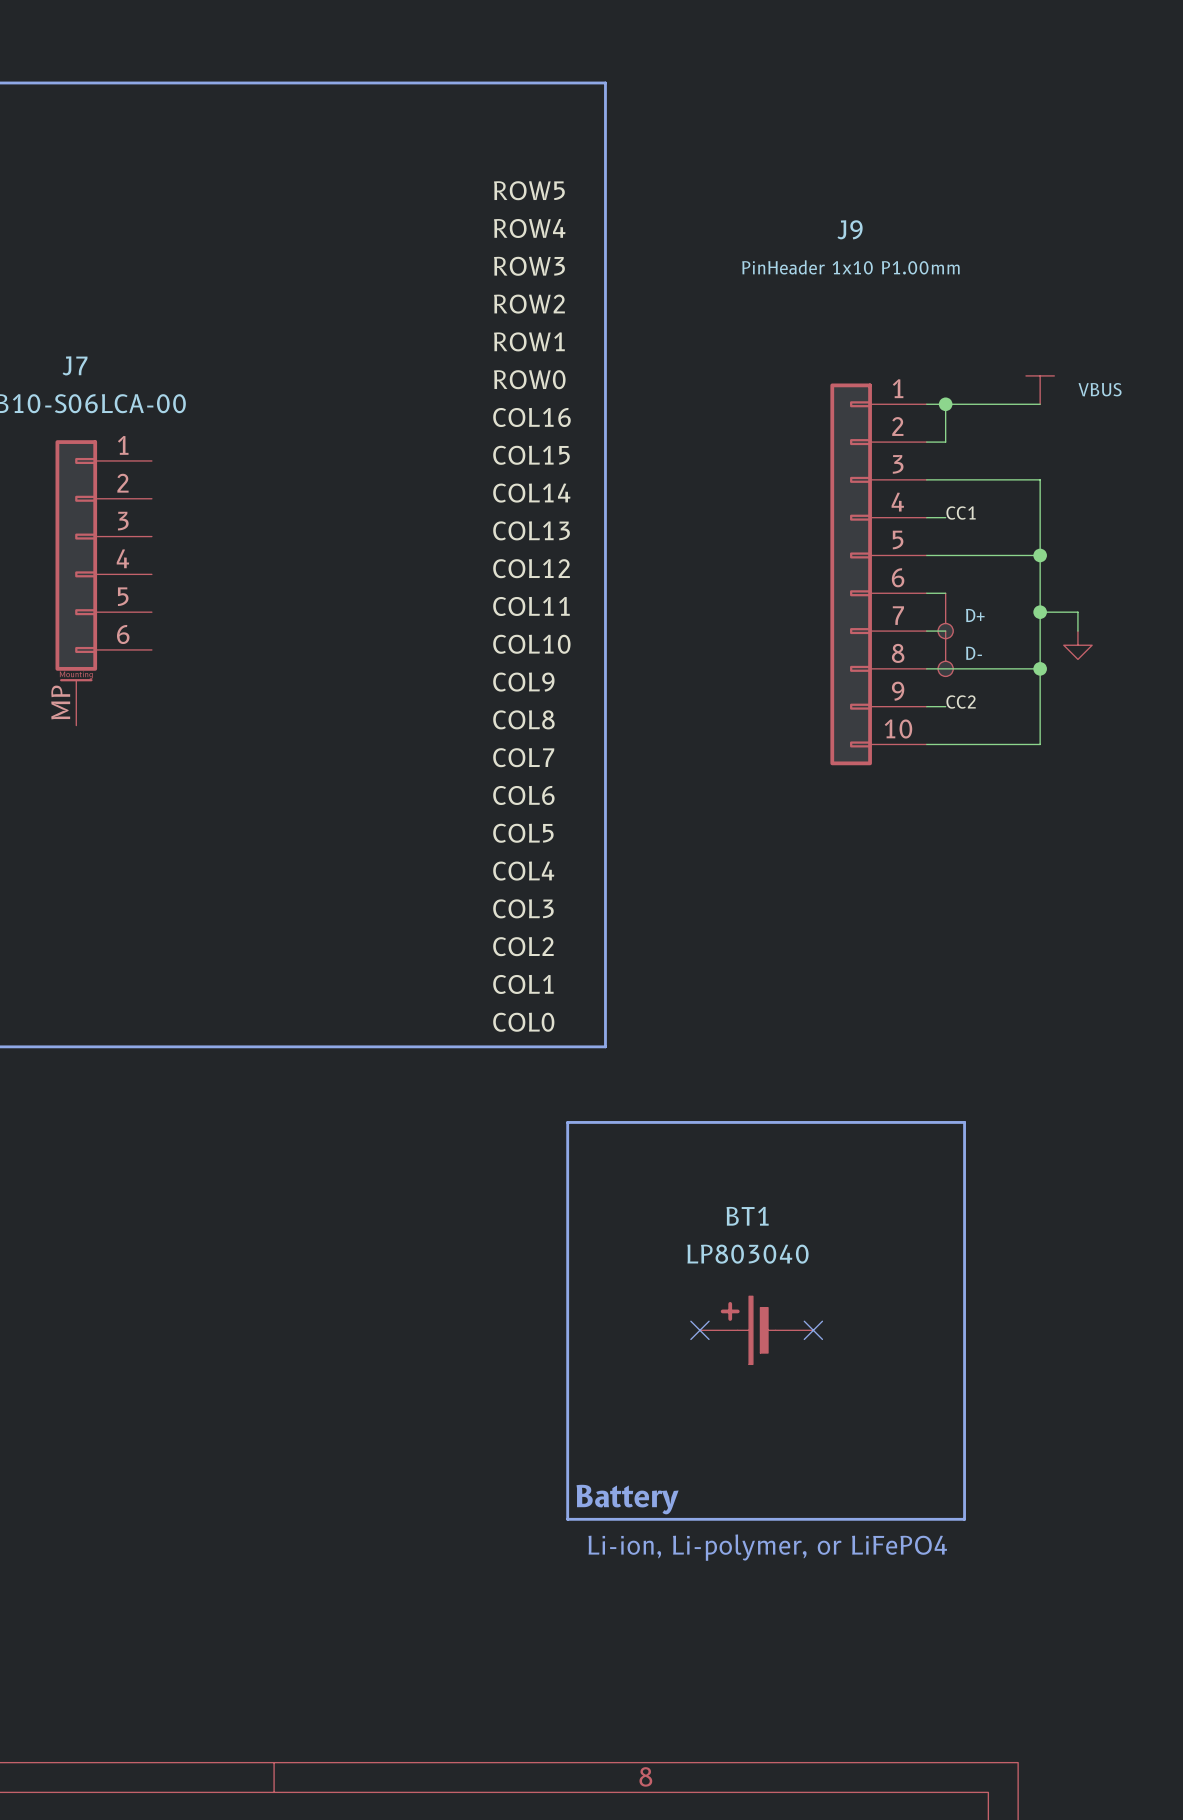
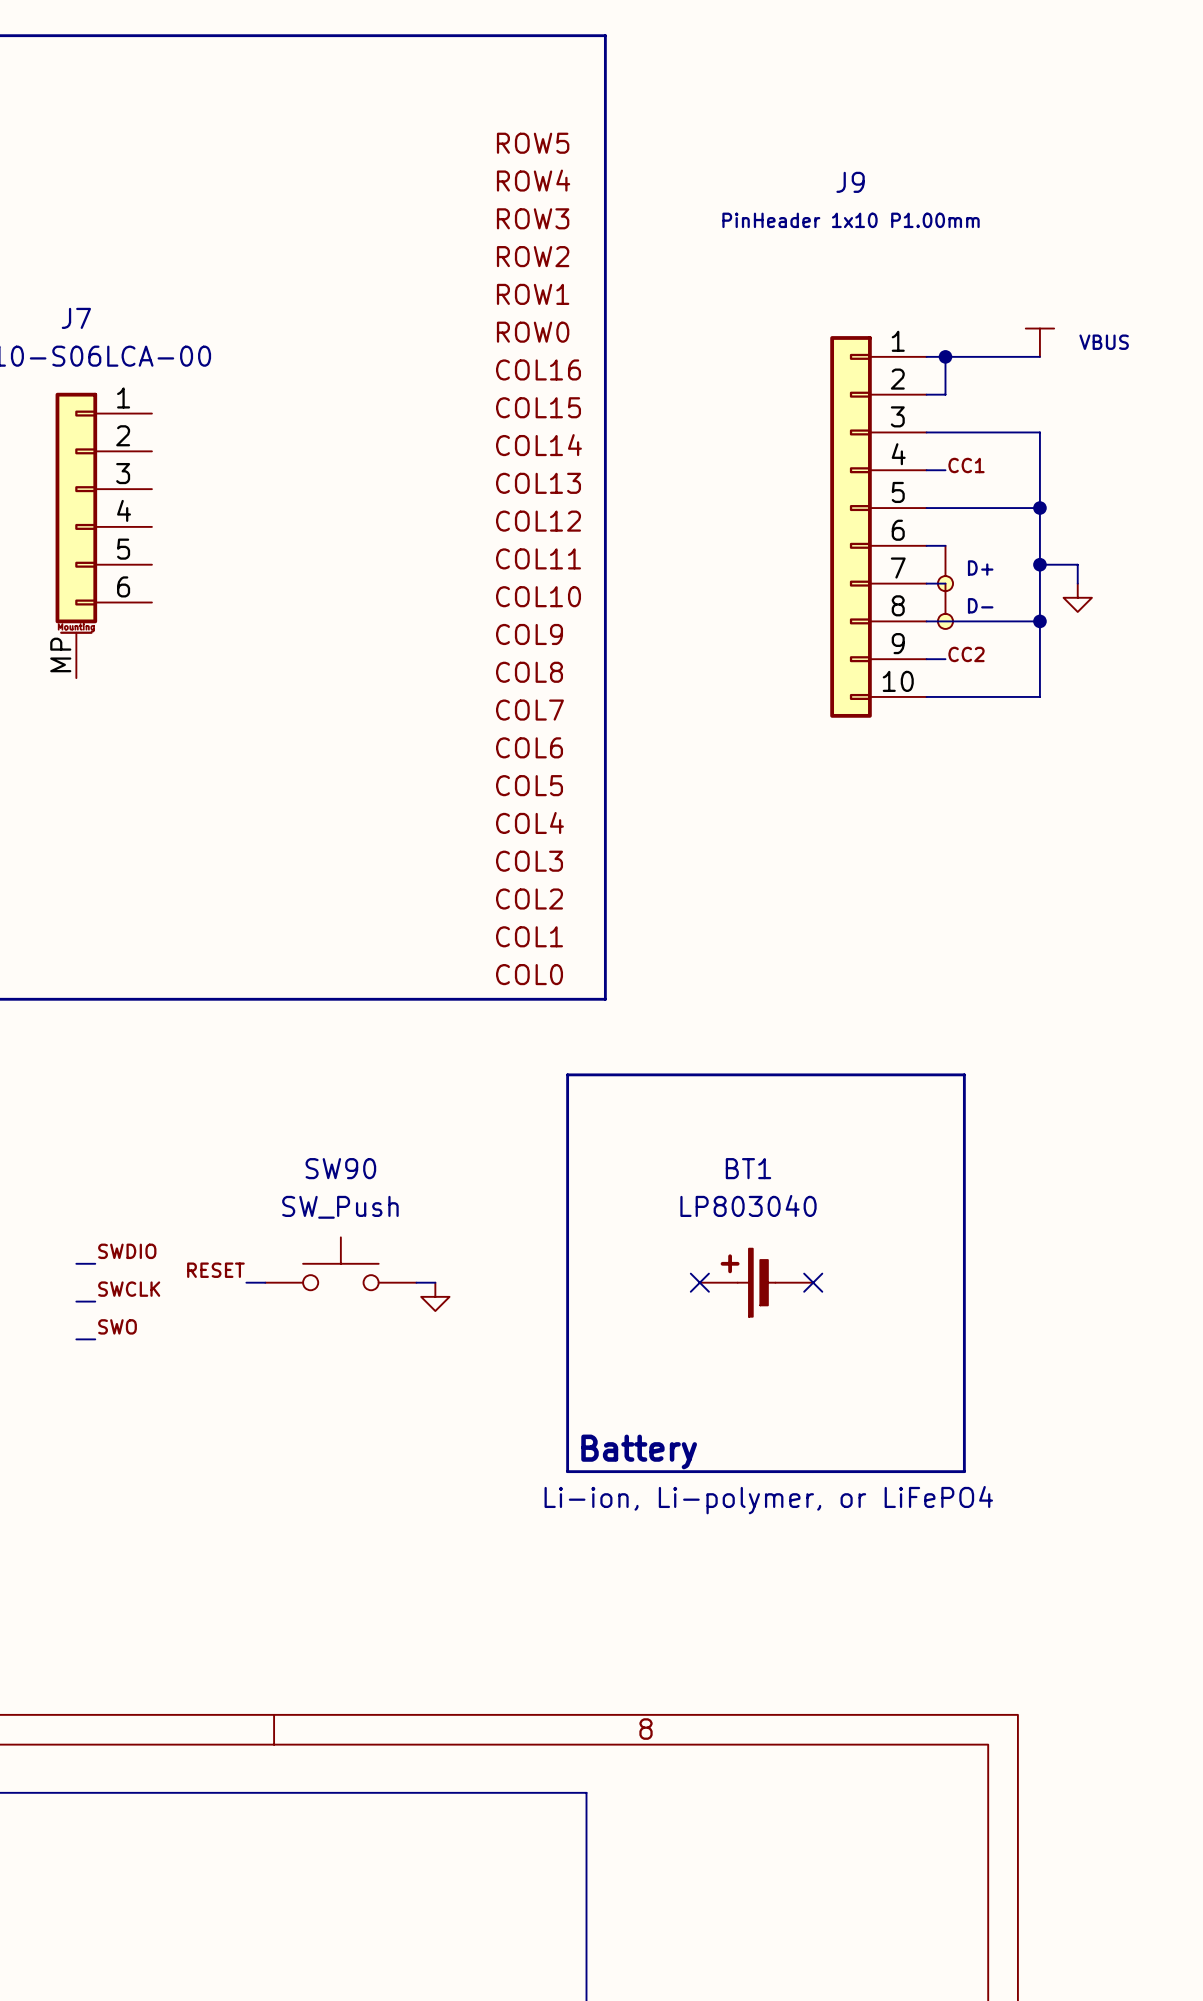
label: none -> SWDIO (127, 1251)
wire: none -> (76, 1263) (95, 1263)
SW90: none -> SW_Push (340, 1263)
label: none -> RESET (215, 1270)
wire: none -> (246, 1282) (265, 1282)
wire: none -> (416, 1282) (435, 1282)
label: none -> SWCLK (129, 1289)
power symbol: none -> (435, 1296)
wire: none -> (76, 1301) (95, 1301)
label: none -> SWO (117, 1326)
wire: none -> (76, 1339) (95, 1339)

